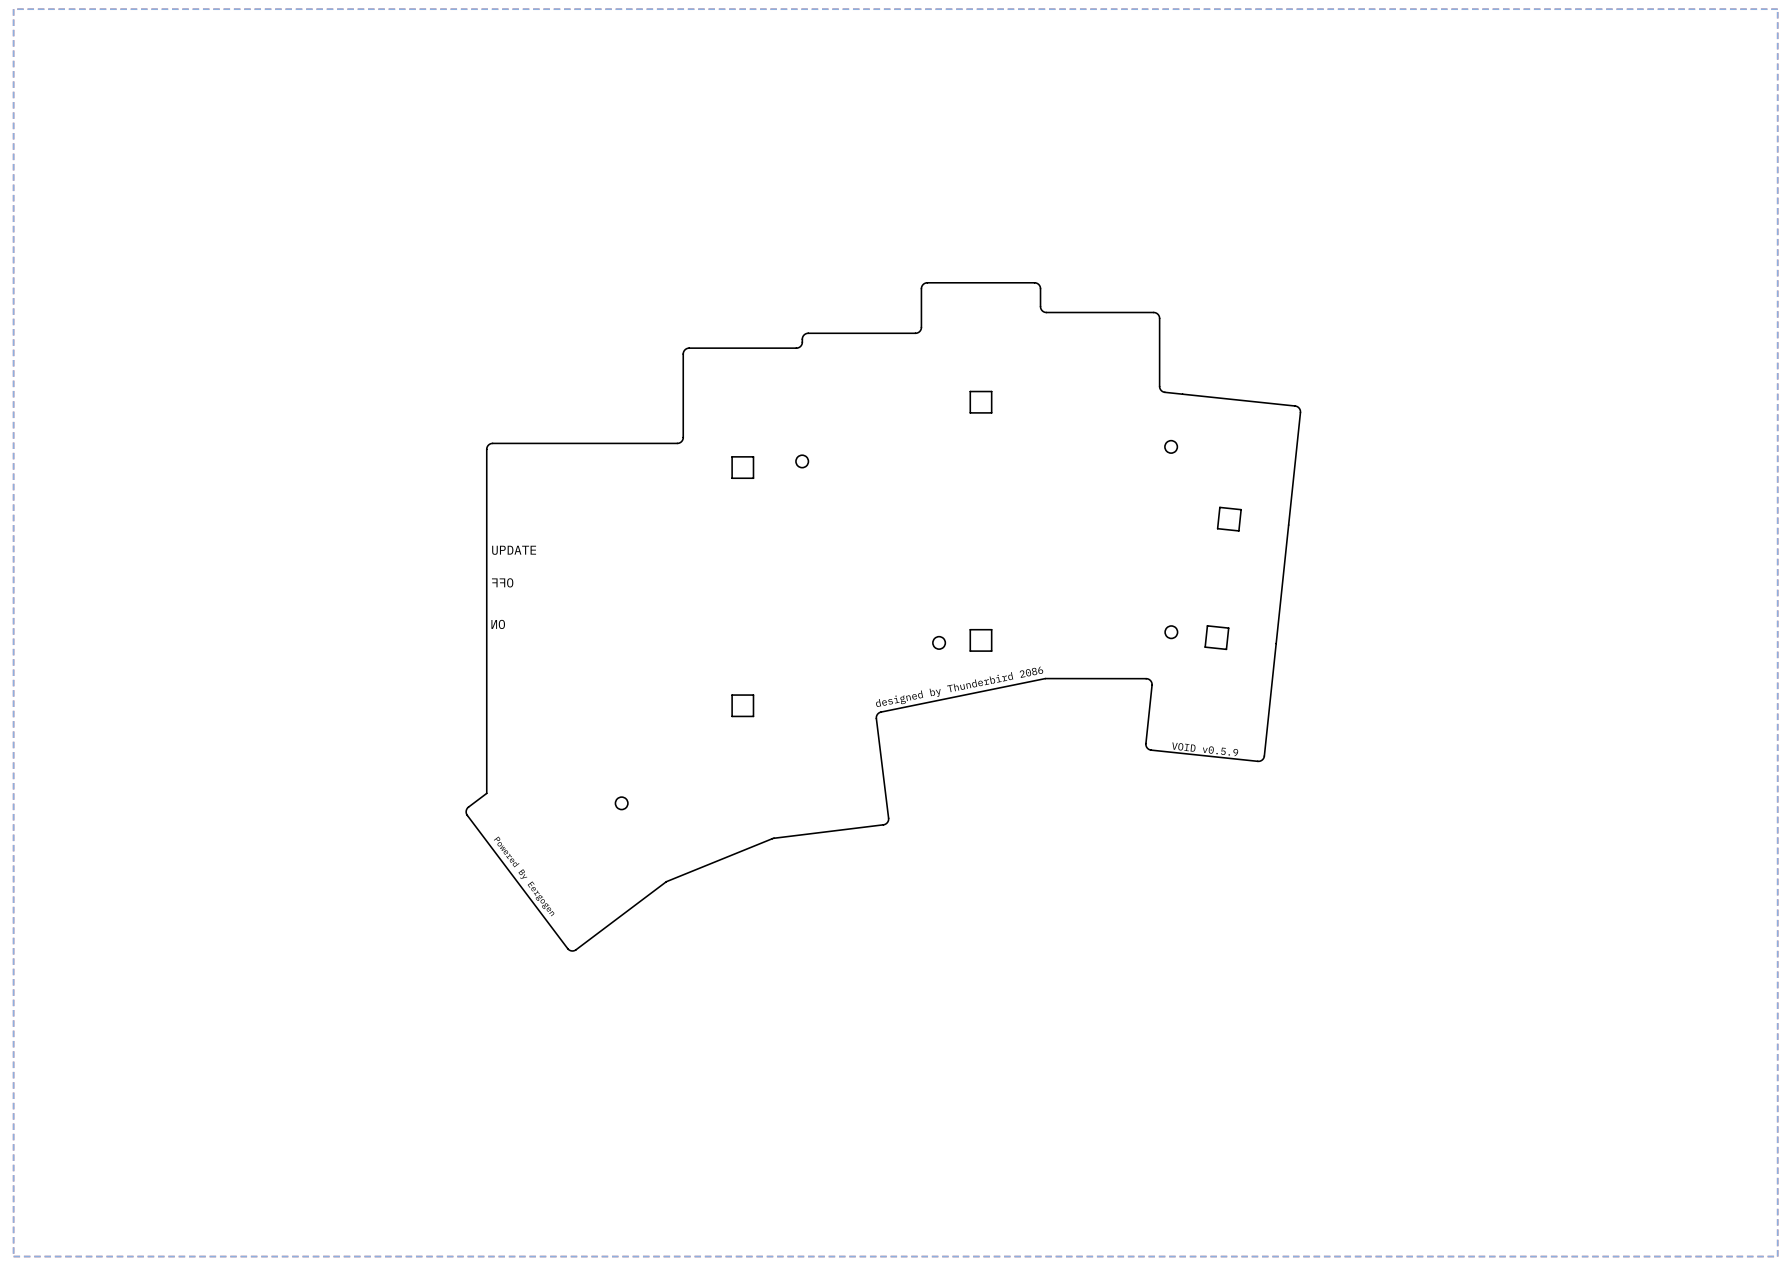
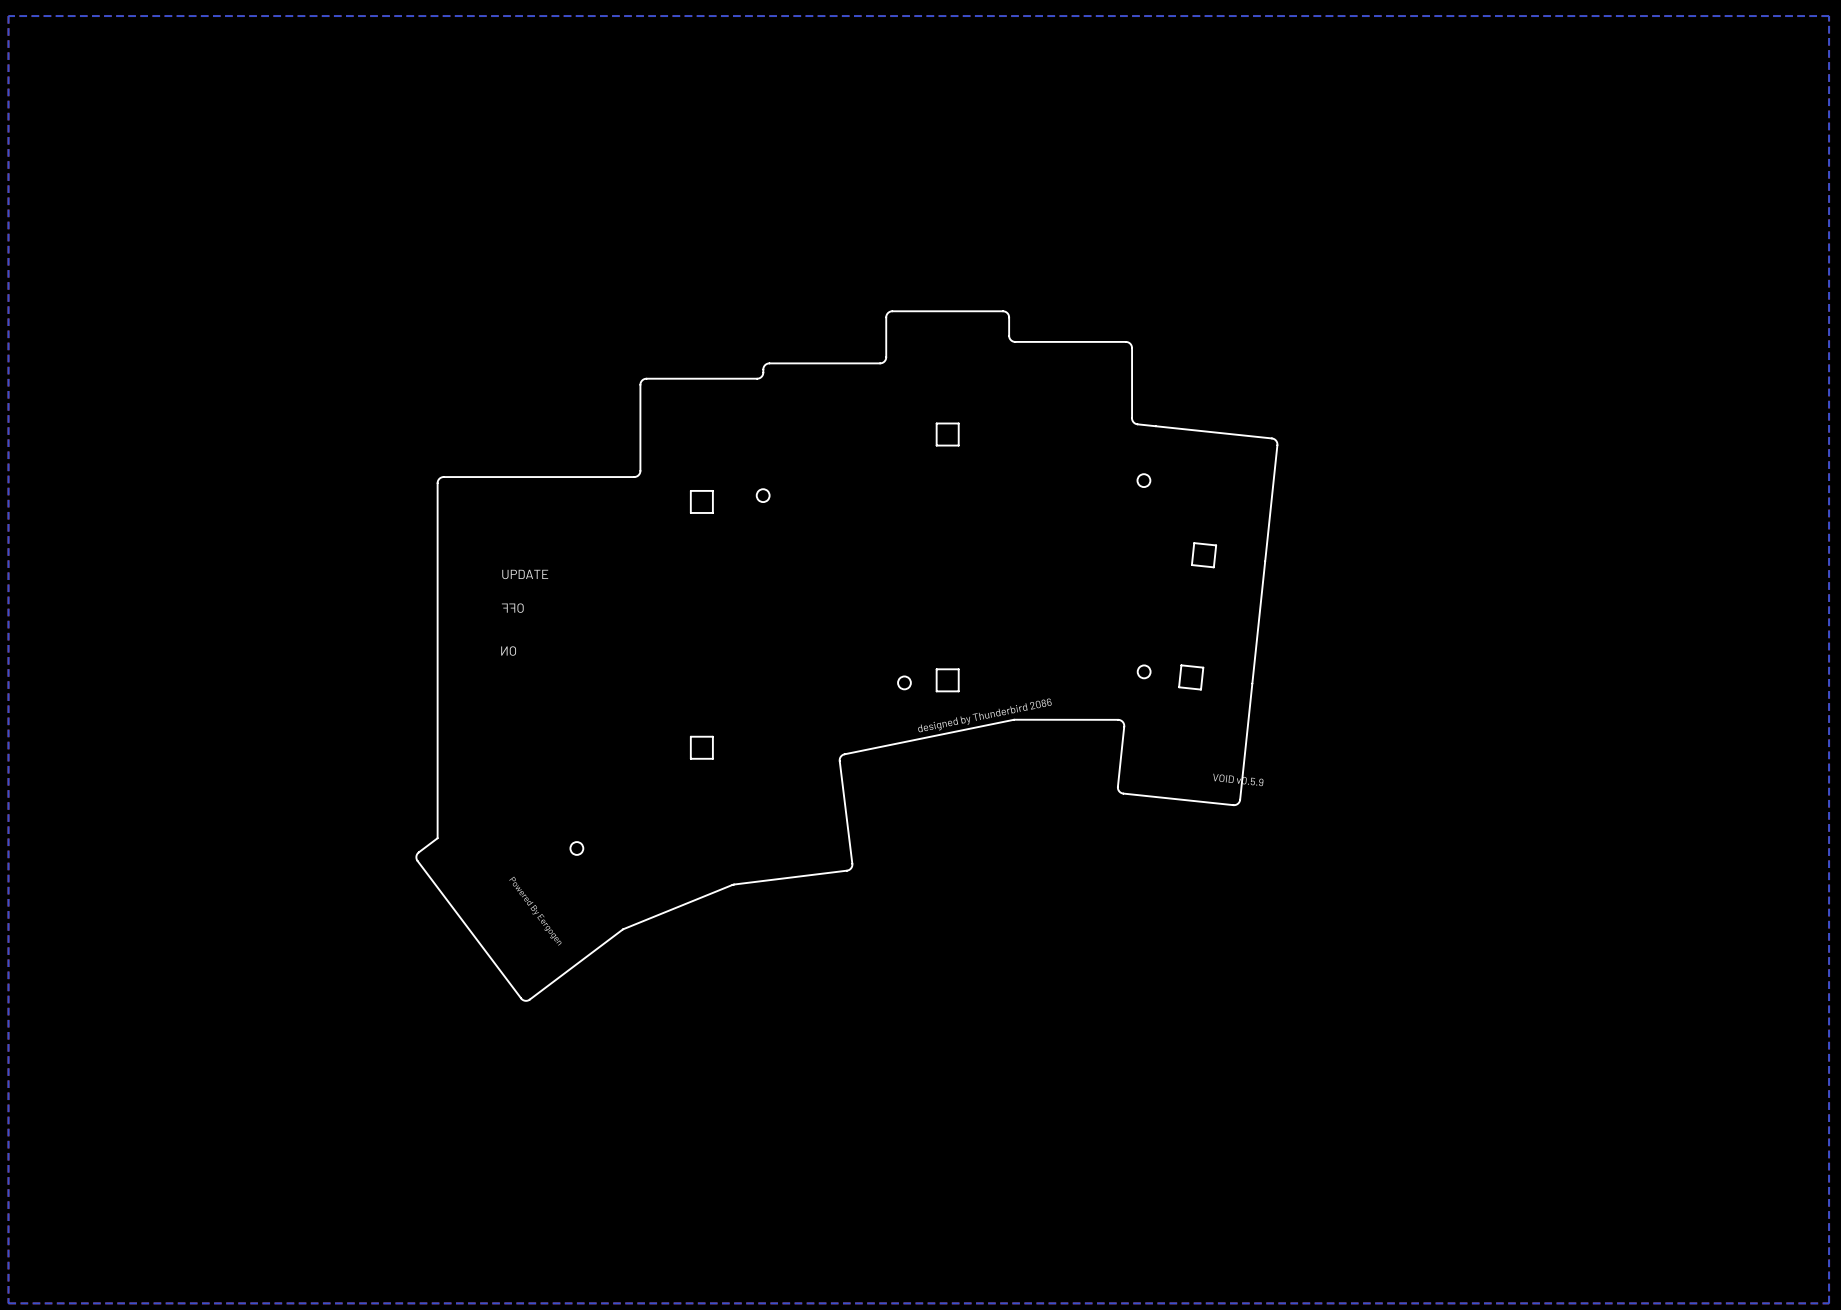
board edge: (1034, 282) (924, 283) (921, 288) (921, 328) (916, 333) (807, 333) (803, 336) (801, 345) (797, 348) (686, 348) (683, 354) (683, 438) (678, 443) (492, 443) (487, 446) (486, 793) (468, 807) (466, 813) (569, 949) (576, 949) (666, 881) (772, 838) (886, 823) (888, 818) (876, 717) (880, 712) (1045, 678) (1146, 678) (1152, 684) (1145, 743) (1148, 749) (1257, 761) (1263, 758) (1299, 409) (1295, 406) (1162, 391) (1159, 387) (1159, 318) (1157, 313) (1045, 312) (1040, 307) (1040, 286) (1034, 282) -> (1003, 311) (1008, 315) (1009, 337) (1013, 341) (1129, 343) (1132, 348) (1132, 418) (1135, 423) (1271, 438) (1276, 442) (1239, 802) (1233, 805) (1120, 792) (1117, 786) (1124, 725) (1122, 721) (1118, 719) (1014, 719) (843, 754) (839, 760) (852, 863) (850, 869) (732, 884) (623, 929) (529, 999) (522, 999) (416, 858) (418, 852) (437, 838) (438, 479) (443, 477) (635, 476) (640, 471) (640, 384) (643, 379) (757, 378) (762, 375) (764, 366) (768, 363) (880, 363) (886, 358) (886, 316) (889, 311) (1003, 311)
board edge: (991, 391) (991, 412) (970, 412) (970, 391) (991, 391) -> (958, 423) (958, 445) (936, 445) (936, 423) (958, 423)
round board edge position: (1171, 446) -> (1143, 480)
board edge: (753, 456) (753, 478) (732, 478) (732, 456) (753, 456) -> (712, 490) (712, 512) (690, 512) (690, 490) (712, 490)
round board edge position: (802, 461) -> (763, 495)
board edge: (1219, 507) (1217, 528) (1238, 530) (1241, 509) (1219, 507) -> (1194, 543) (1191, 565) (1213, 567) (1216, 545) (1194, 543)
board edge: (1207, 625) (1205, 647) (1226, 649) (1228, 628) (1207, 625) -> (1181, 665) (1179, 687) (1201, 689) (1203, 667) (1181, 665)
board edge: (991, 629) (991, 651) (970, 651) (970, 629) (991, 629) -> (958, 669) (958, 691) (936, 691) (936, 669) (958, 669)
round board edge position: (1171, 632) -> (1144, 671)
round board edge position: (939, 642) -> (904, 682)
board edge: (753, 695) (732, 695) (732, 716) (753, 716) (753, 695) -> (712, 736) (690, 736) (690, 758) (712, 758) (712, 736)
round board edge position: (621, 803) -> (576, 848)

